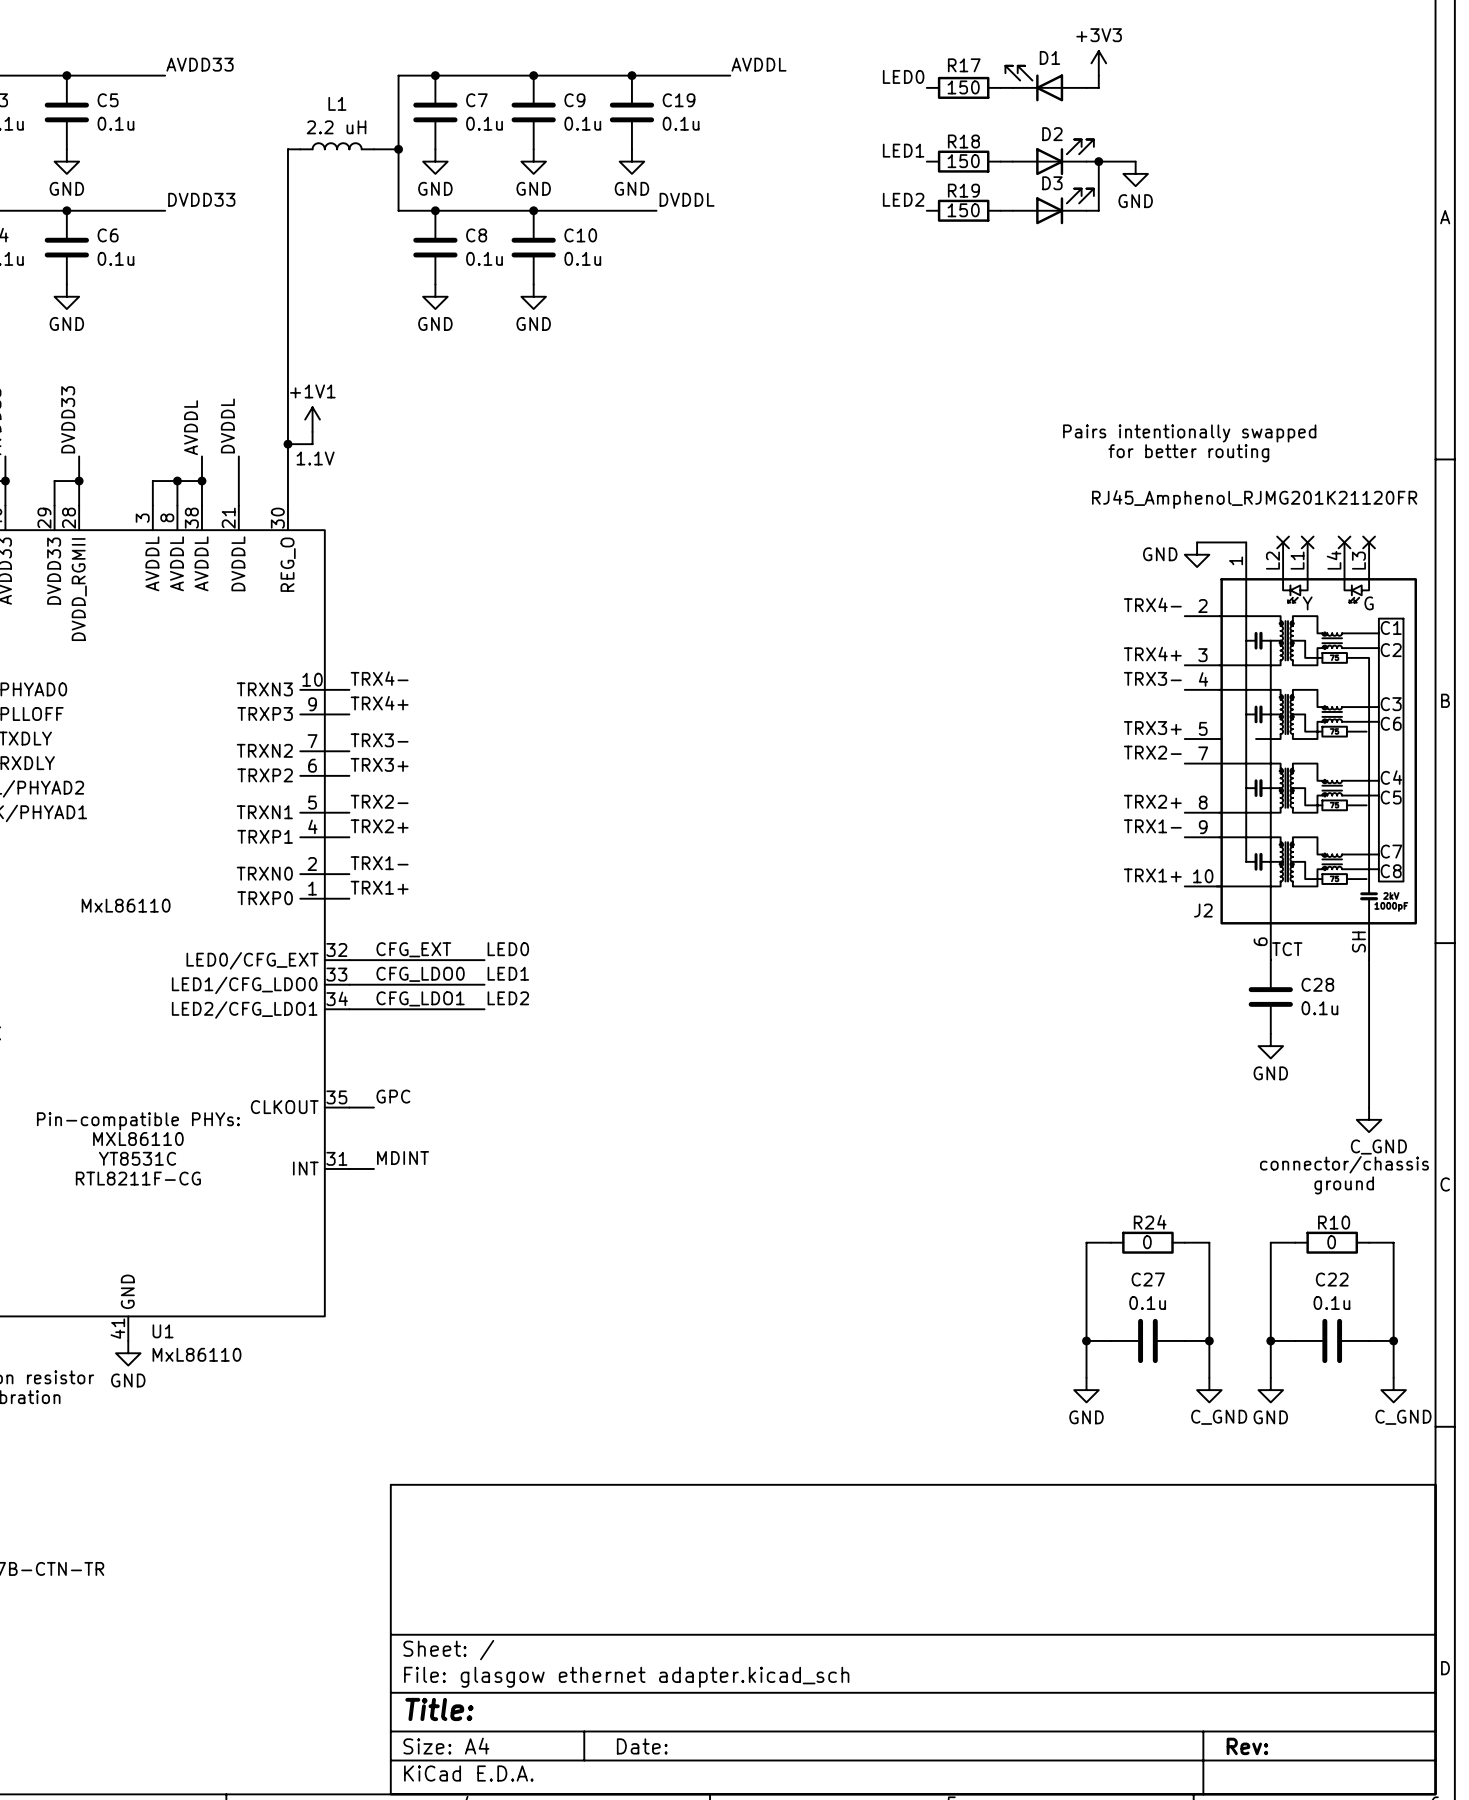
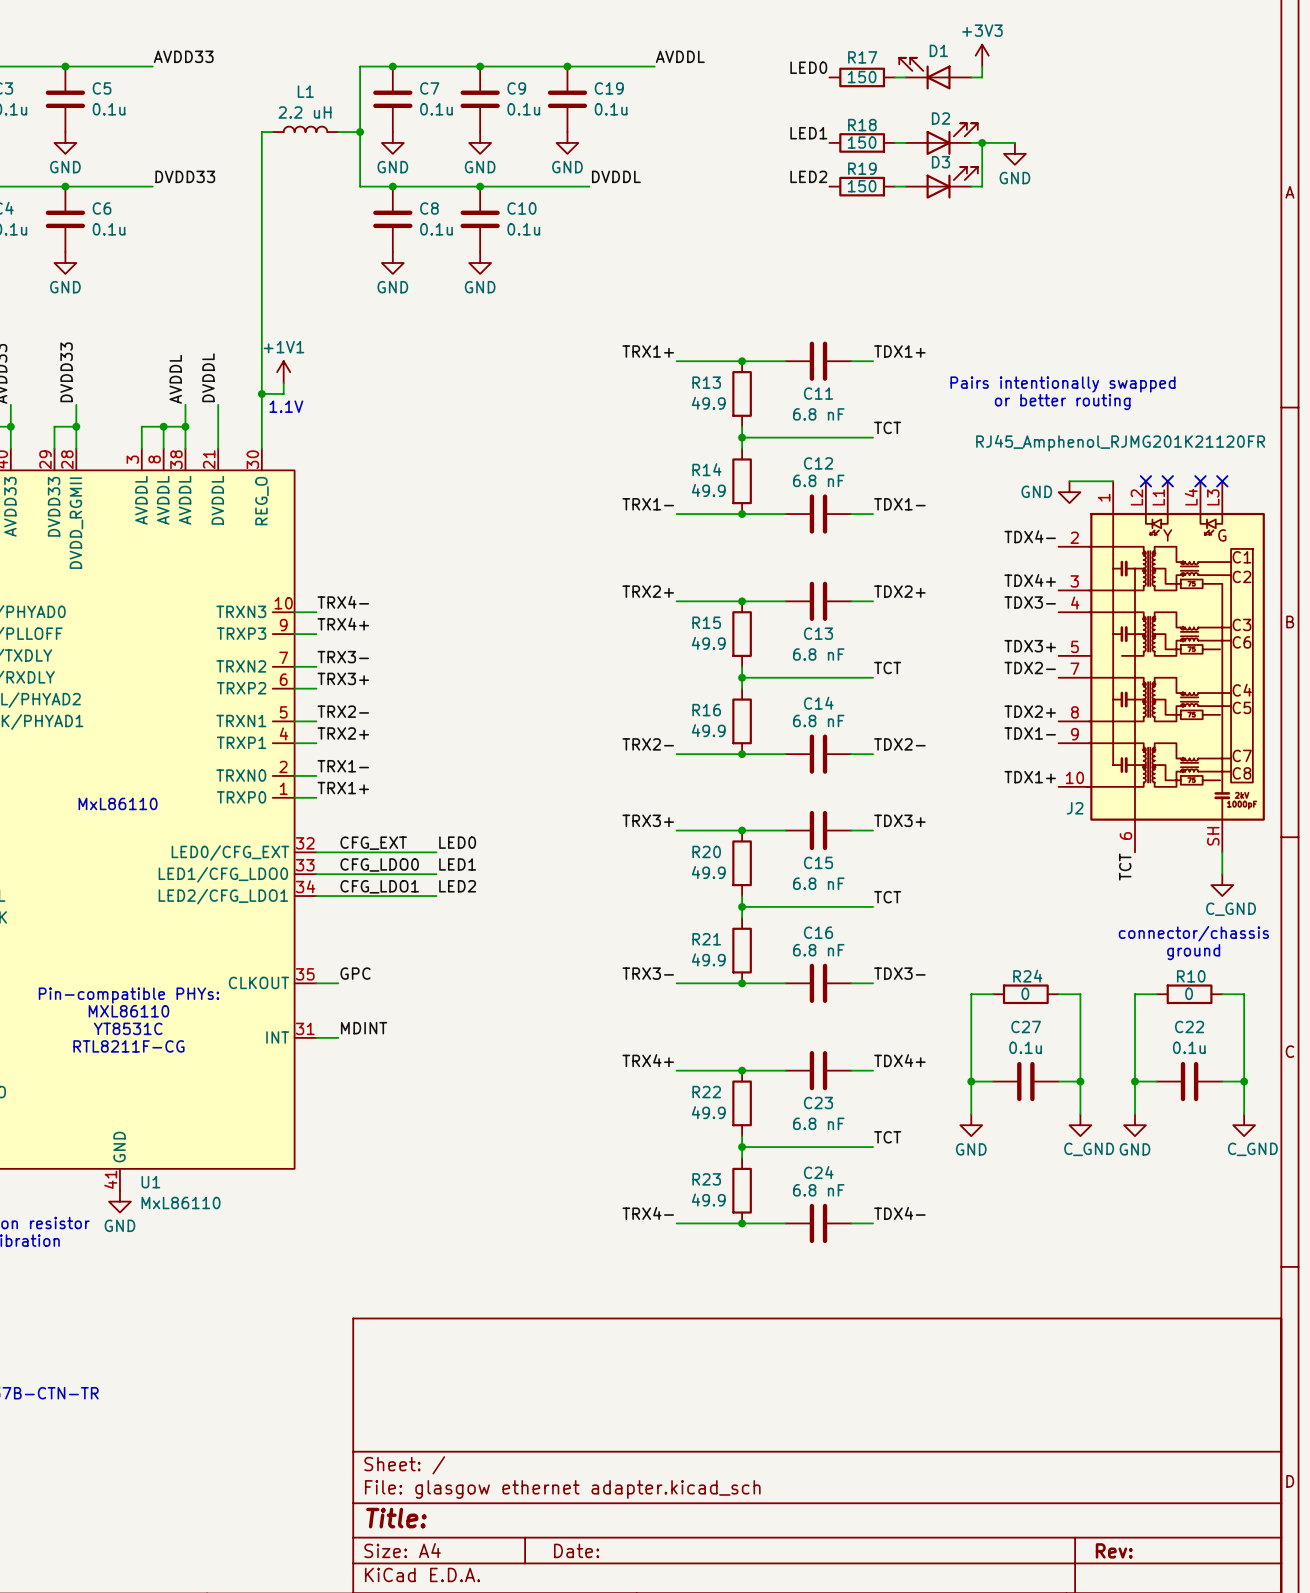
label: none -> TRX1+ (648, 351)
label: none -> TDX1+ (899, 351)
wire: none -> (676, 361) (785, 361)
junction: none -> (742, 361)
C11: none -> 6.8 nF (818, 361)
wire: none -> (851, 361) (873, 361)
R13: none -> 49.9 (742, 393)
text: for better routing (1188, 453) -> or better routing (1062, 402)
wire: none -> (742, 426) (742, 448)
label: none -> TCT (887, 427)
wire: none -> (742, 437) (873, 437)
junction: none -> (742, 437)
R14: none -> 49.9 (742, 481)
label: none -> TRX1- (648, 504)
label: none -> TDX1- (899, 504)
wire: none -> (676, 514) (785, 514)
junction: none -> (742, 514)
C12: none -> 6.8 nF (818, 514)
wire: none -> (851, 514) (873, 514)
label: TRX4- (1152, 604) -> TDX4- (1030, 536)
label: TRX4+ (1152, 654) -> TDX4+ (1030, 580)
label: none -> TRX2+ (648, 591)
label: none -> TDX2+ (899, 591)
wire: none -> (676, 601) (785, 601)
junction: none -> (742, 601)
C13: none -> 6.8 nF (818, 601)
wire: none -> (851, 601) (873, 601)
label: TRX3- (1152, 678) -> TDX3- (1030, 602)
R15: none -> 49.9 (742, 634)
label: TRX3+ (1152, 728) -> TDX3+ (1030, 646)
wire: none -> (742, 666) (742, 688)
label: none -> TCT (887, 668)
label: TRX2- (1152, 752) -> TDX2- (1030, 668)
wire: none -> (742, 677) (873, 677)
junction: none -> (742, 677)
label: TRX2+ (1152, 801) -> TDX2+ (1030, 711)
R16: none -> 49.9 (742, 721)
label: TRX1- (1152, 826) -> TDX1- (1030, 733)
label: none -> TRX2- (648, 744)
label: none -> TDX2- (899, 744)
wire: none -> (676, 754) (785, 754)
junction: none -> (742, 754)
C14: none -> 6.8 nF (818, 754)
wire: none -> (851, 754) (873, 754)
label: TRX1+ (1152, 875) -> TDX1+ (1030, 777)
label: none -> TRX3+ (648, 820)
label: none -> TDX3+ (899, 820)
wire: none -> (676, 830) (785, 830)
junction: none -> (742, 830)
C15: none -> 6.8 nF (818, 830)
wire: none -> (851, 830) (873, 830)
label rotation: 0° (1287, 949) -> 90° counterclockwise (1125, 867)
label position: TCT (1287, 949) -> TCT (1125, 867)
R20: none -> 49.9 (742, 863)
wire: (1369, 984) (1369, 1107) -> none
C28: 0.1u (1270, 996) -> none
power symbol: none -> C_GND (1222, 885)
wire: none -> (742, 896) (742, 917)
label: none -> TCT (887, 897)
wire: none -> (742, 906) (873, 906)
junction: none -> (742, 906)
power symbol: GND (1270, 1046) -> none
R21: none -> 49.9 (742, 950)
label: none -> TRX3- (648, 973)
label: none -> TDX3- (899, 973)
wire: none -> (676, 983) (785, 983)
junction: none -> (742, 983)
C16: none -> 6.8 nF (818, 983)
wire: none -> (851, 983) (873, 983)
power symbol: C_GND (1369, 1119) -> none
text position: connector/chassis (1344, 1164) -> connector/chassis (1193, 933)
text position: ground (1344, 1185) -> ground (1193, 952)
label: none -> TRX4+ (648, 1060)
label: none -> TDX4+ (899, 1060)
wire: none -> (676, 1070) (785, 1070)
junction: none -> (742, 1070)
C23: none -> 6.8 nF (818, 1070)
wire: none -> (851, 1070) (873, 1070)
junction: none -> (971, 1081)
junction: none -> (1080, 1081)
junction: none -> (1134, 1081)
junction: none -> (1244, 1081)
R22: none -> 49.9 (742, 1103)
wire: (1086, 1242) (1111, 1242) -> (971, 1103) (971, 994) (993, 994)
R24 position: (1147, 1242) -> (1025, 994)
wire: (1184, 1242) (1209, 1242) -> (1058, 994) (1080, 994) (1080, 1103)
wire: (1270, 1242) (1295, 1242) -> (1134, 1103) (1134, 994) (1156, 994)
R10 position: (1332, 1242) -> (1189, 994)
wire: (1369, 1242) (1393, 1242) -> (1222, 994) (1244, 994) (1244, 1103)
wire: (1086, 1254) (1086, 1377) -> none
wire: (1209, 1254) (1209, 1377) -> none
wire: (1270, 1254) (1270, 1377) -> none
wire: (1393, 1254) (1393, 1377) -> none
power symbol: none -> GND (971, 1125)
power symbol: none -> C_GND (1080, 1125)
power symbol: none -> GND (1134, 1125)
power symbol: none -> C_GND (1244, 1125)
wire: none -> (742, 1136) (742, 1157)
label: none -> TCT (887, 1137)
wire: none -> (742, 1147) (873, 1147)
junction: none -> (742, 1147)
R23: none -> 49.9 (742, 1190)
wire: (1086, 1340) (1111, 1340) -> (971, 1081) (993, 1081)
junction: (1086, 1340) -> none
C27 position: (1147, 1340) -> (1025, 1081)
wire: (1184, 1340) (1209, 1340) -> (1058, 1081) (1080, 1081)
junction: (1209, 1340) -> none
wire: (1270, 1340) (1295, 1340) -> (1134, 1081) (1156, 1081)
junction: (1270, 1340) -> none
C22 position: (1332, 1340) -> (1189, 1081)
wire: (1369, 1340) (1393, 1340) -> (1222, 1081) (1244, 1081)
junction: (1393, 1340) -> none
label: none -> TRX4- (648, 1213)
label: none -> TDX4- (899, 1213)
wire: none -> (676, 1223) (785, 1223)
junction: none -> (742, 1223)
C24: none -> 6.8 nF (818, 1223)
wire: none -> (851, 1223) (873, 1223)
power symbol: GND (1086, 1390) -> none
power symbol: C_GND (1209, 1390) -> none
power symbol: GND (1270, 1390) -> none
power symbol: C_GND (1393, 1390) -> none

